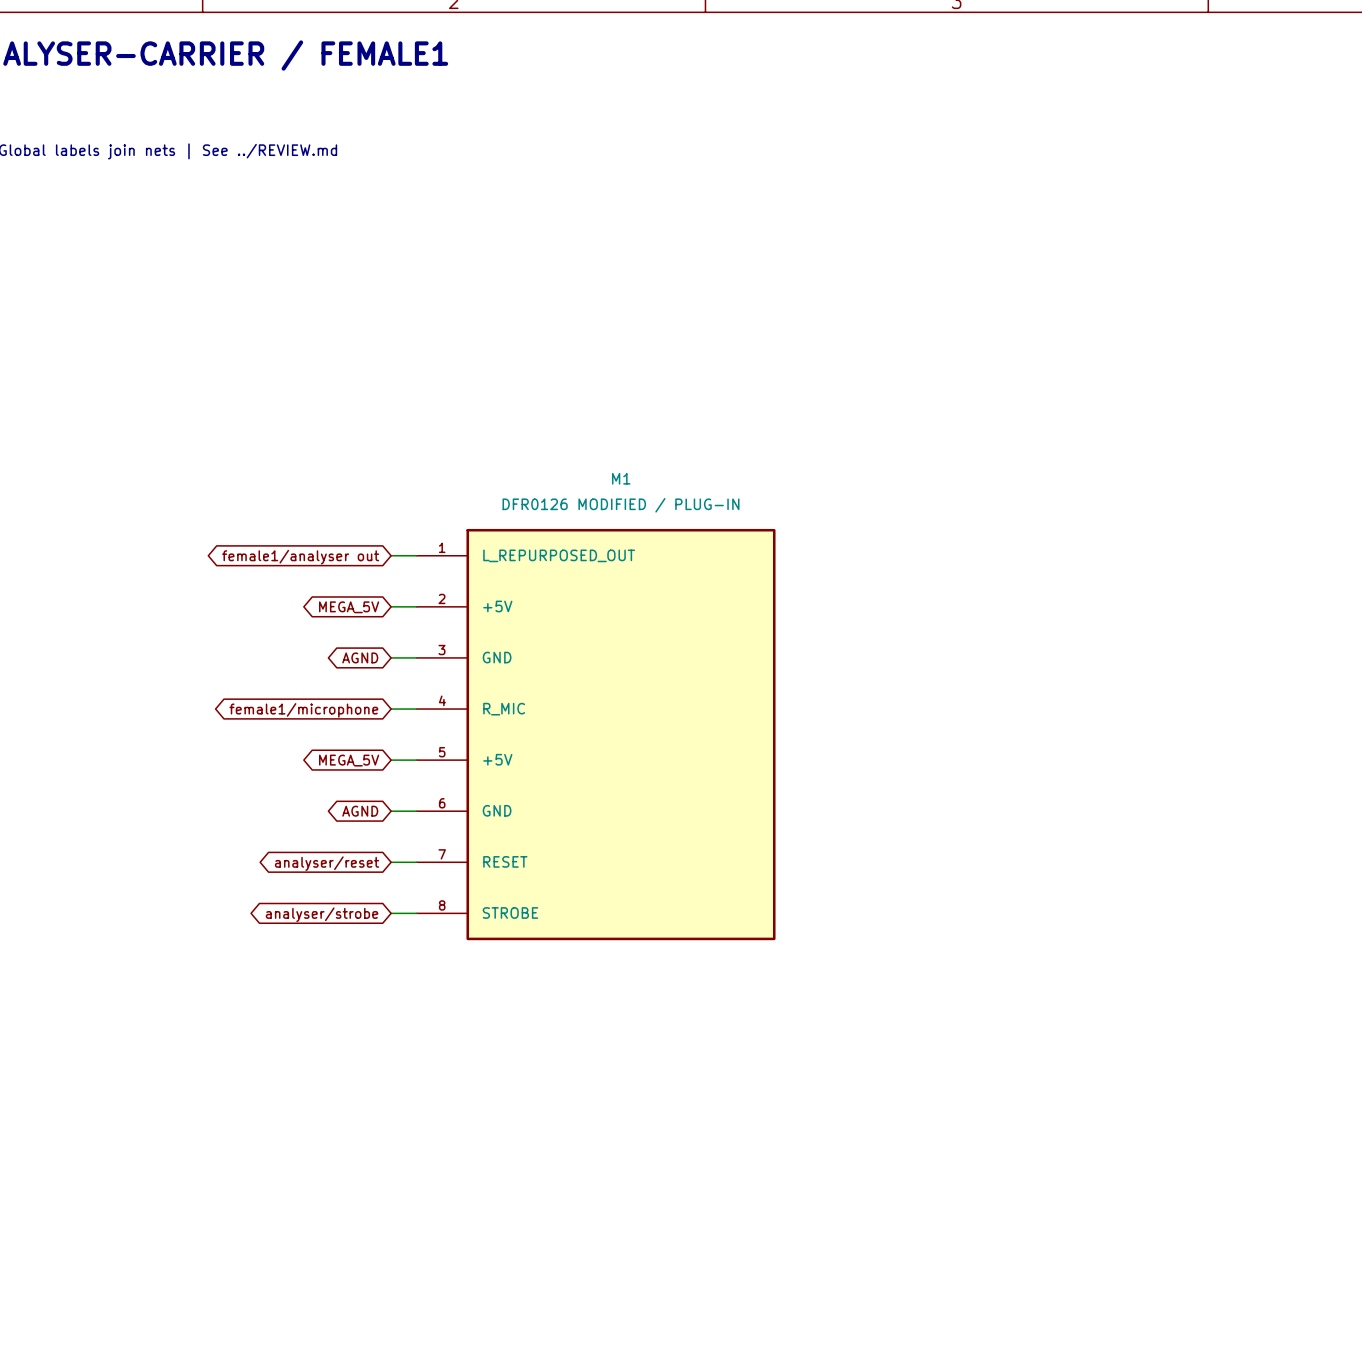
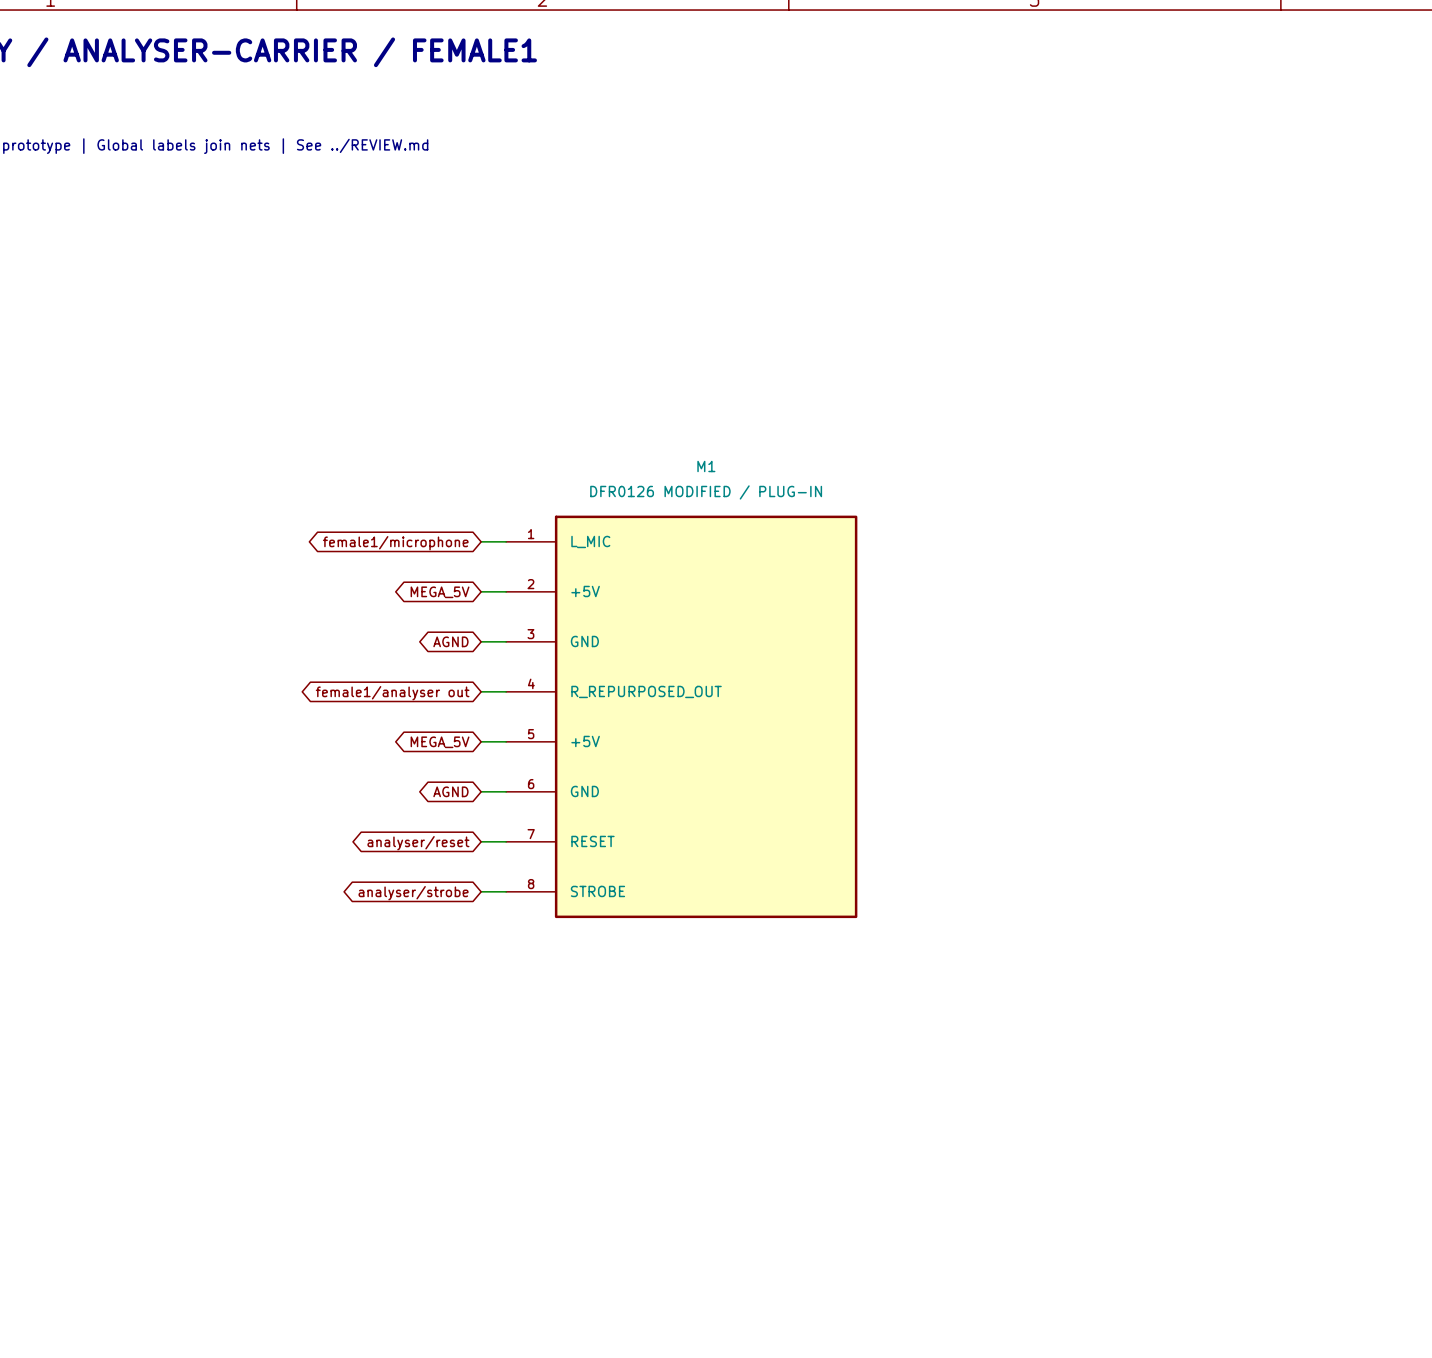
M1 pin name: L_REPURPOSED_OUT (559, 555) -> L_MIC (590, 541)
global label: female1/analyser out (300, 557) -> female1/microphone (395, 543)
M1 pin name: R_MIC (504, 709) -> R_REPURPOSED_OUT (646, 691)
global label: female1/microphone (303, 710) -> female1/analyser out (392, 693)

